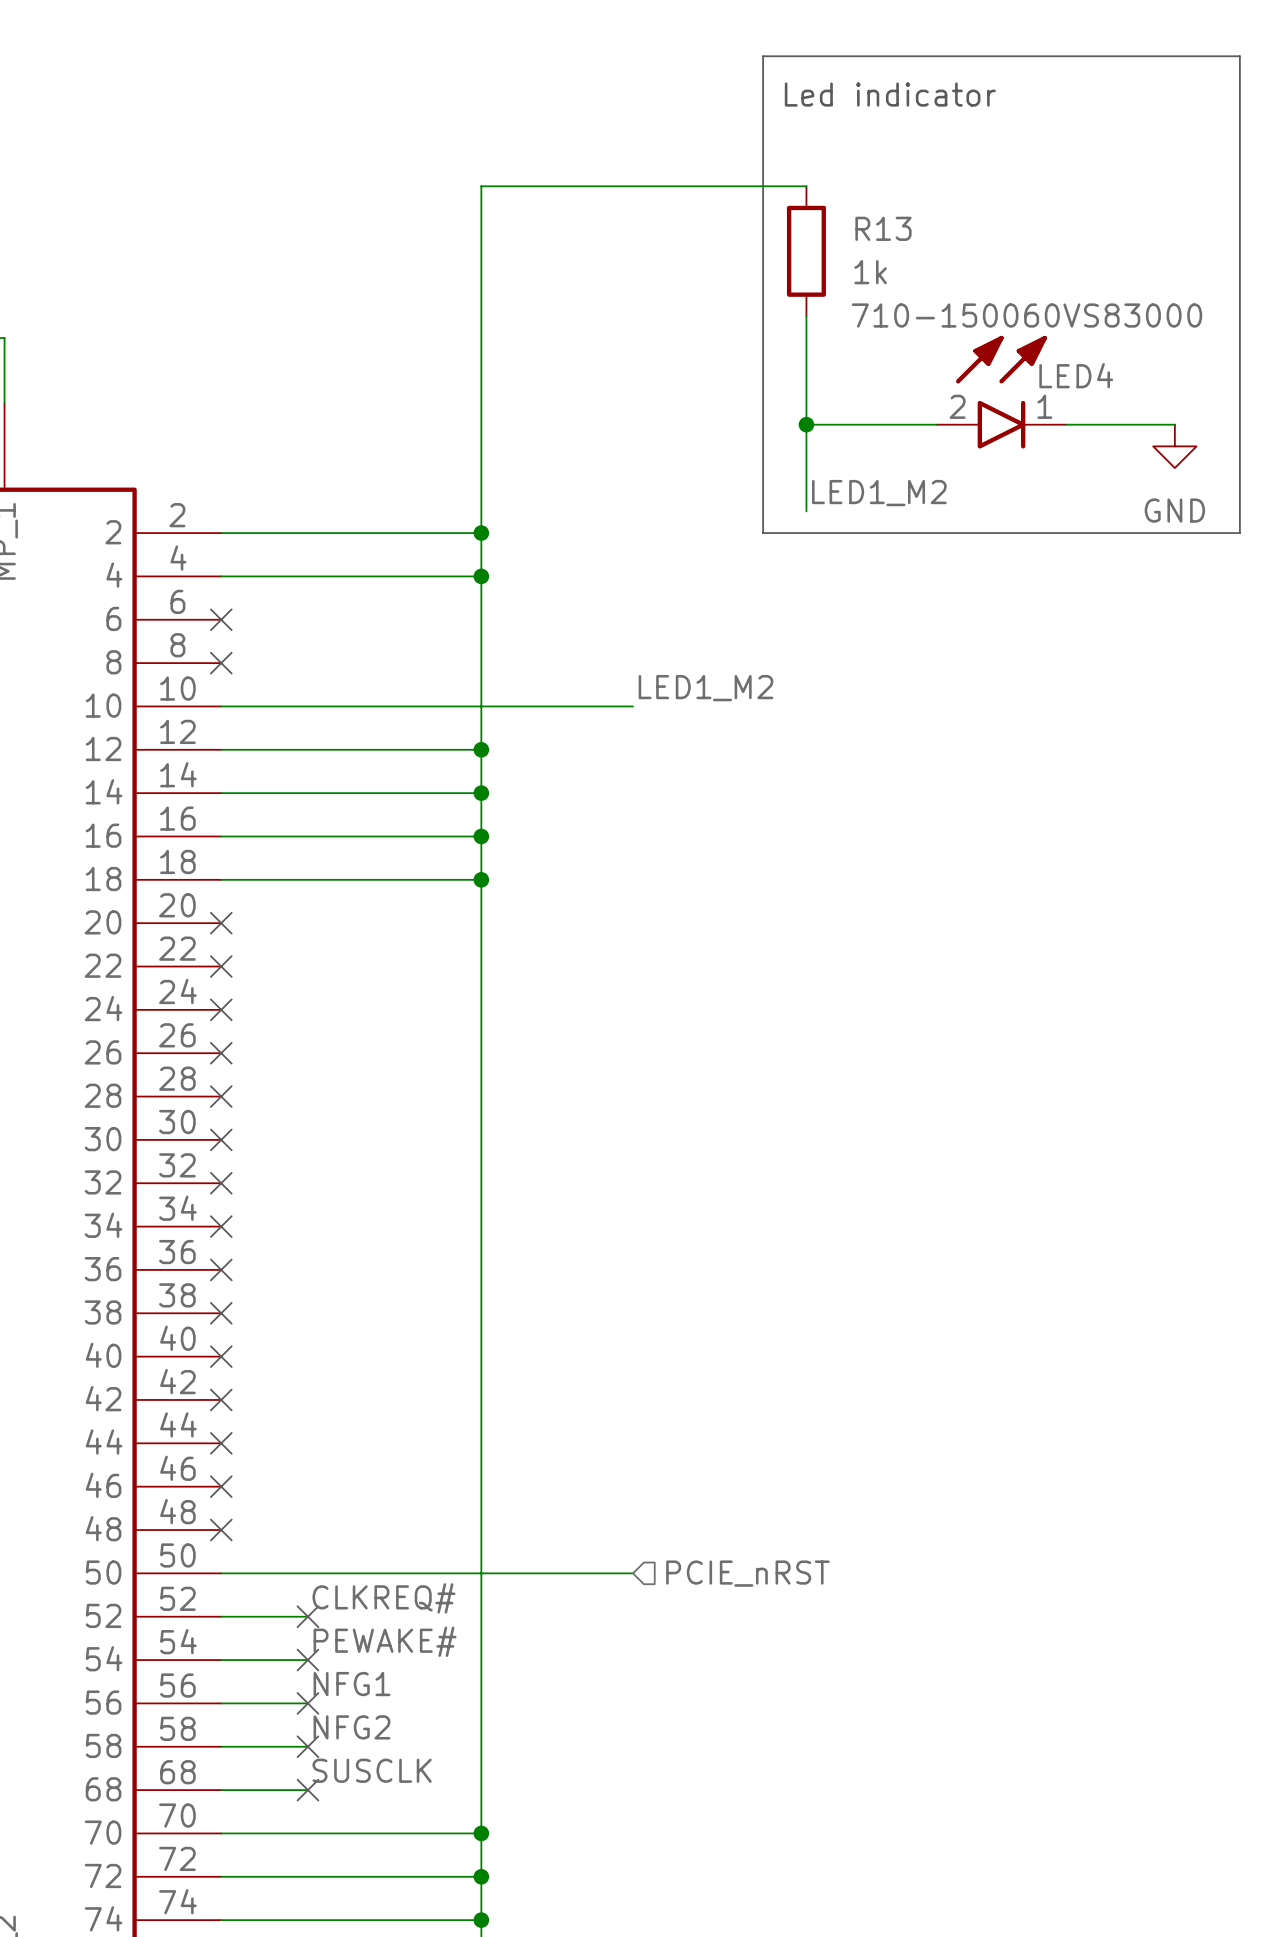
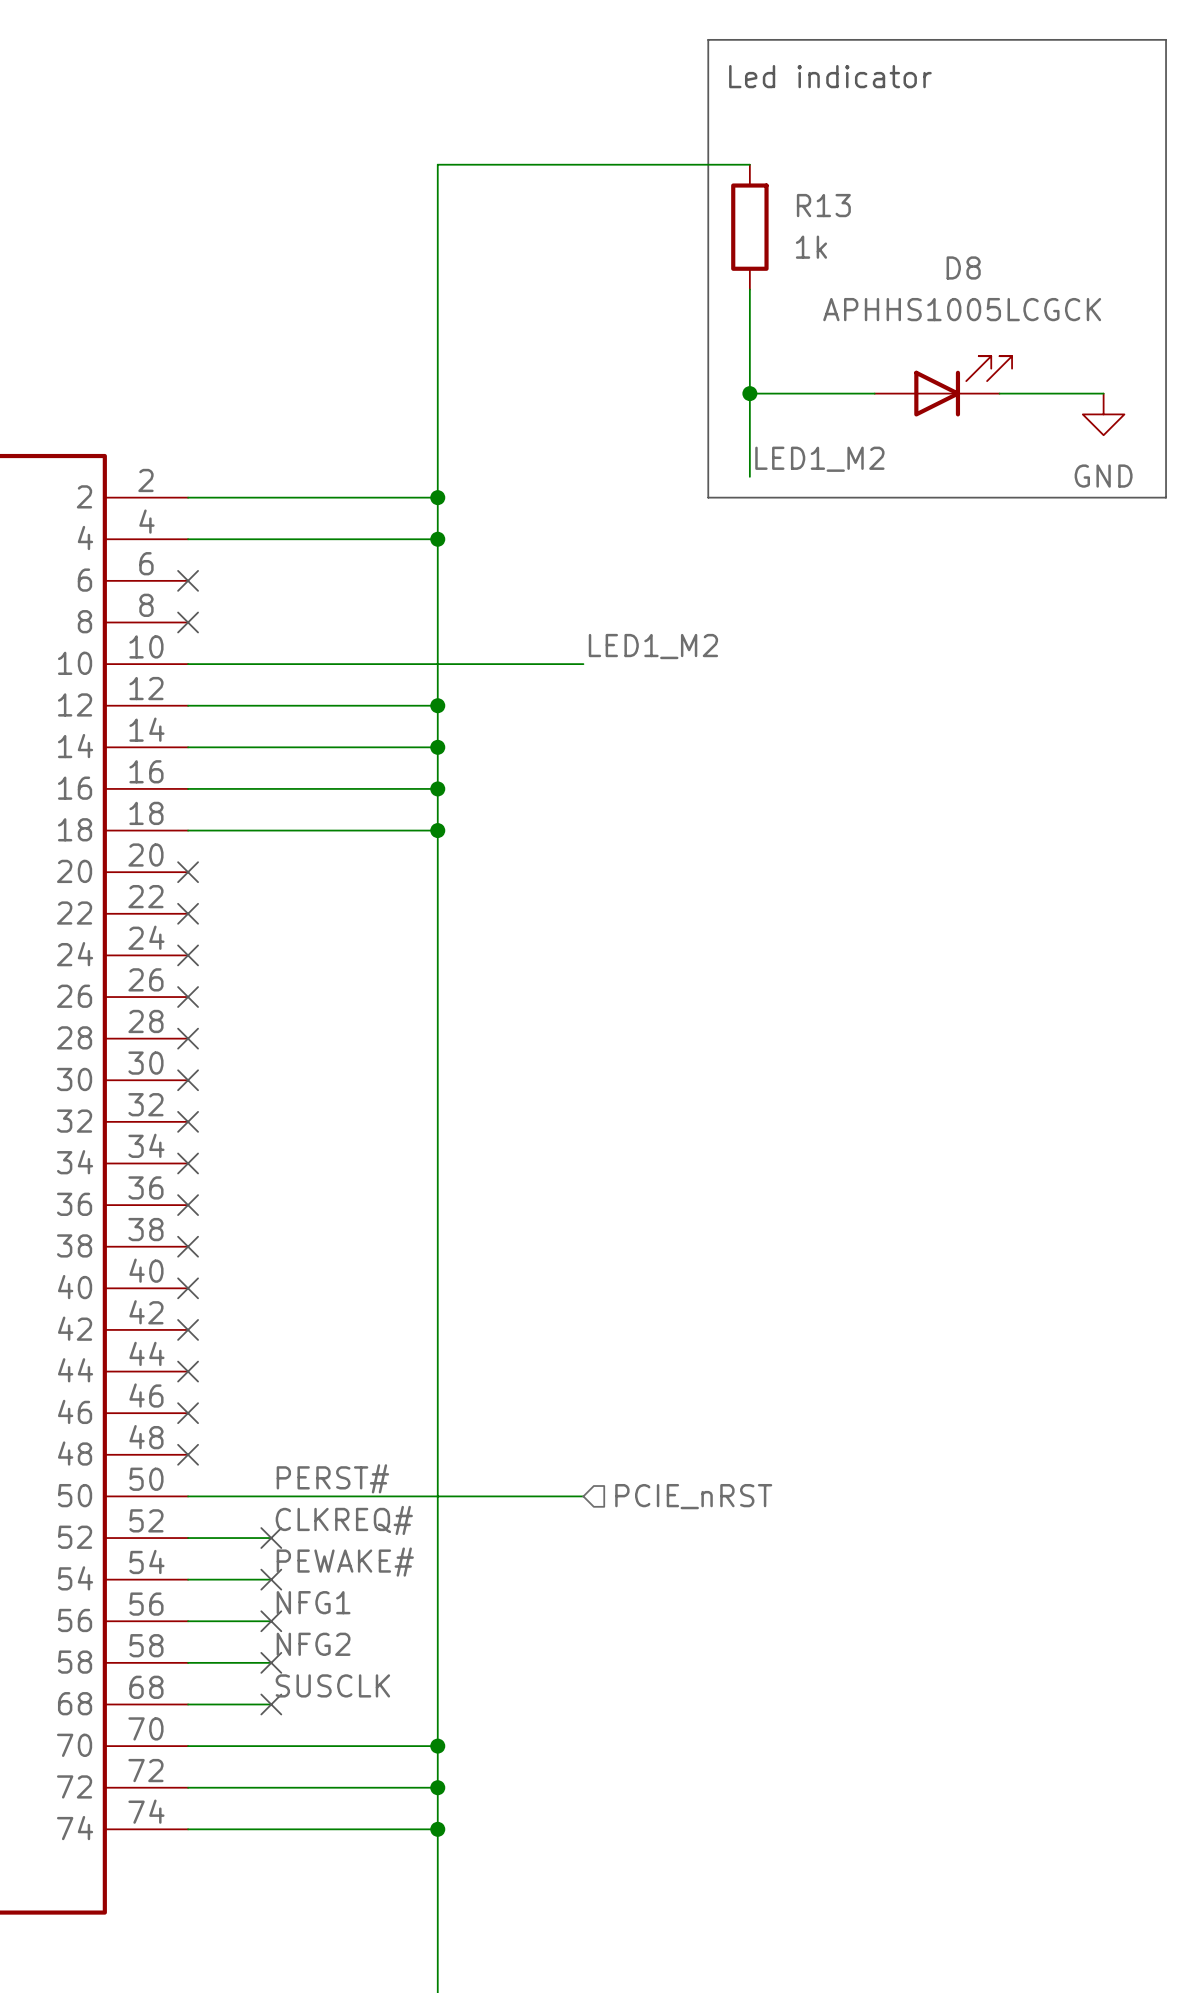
LED4: 710-150060VS83000 (1001, 392) -> none
D8: none -> APHHS1005LCGCK (943, 386)
label: none -> PERST# (332, 1478)

